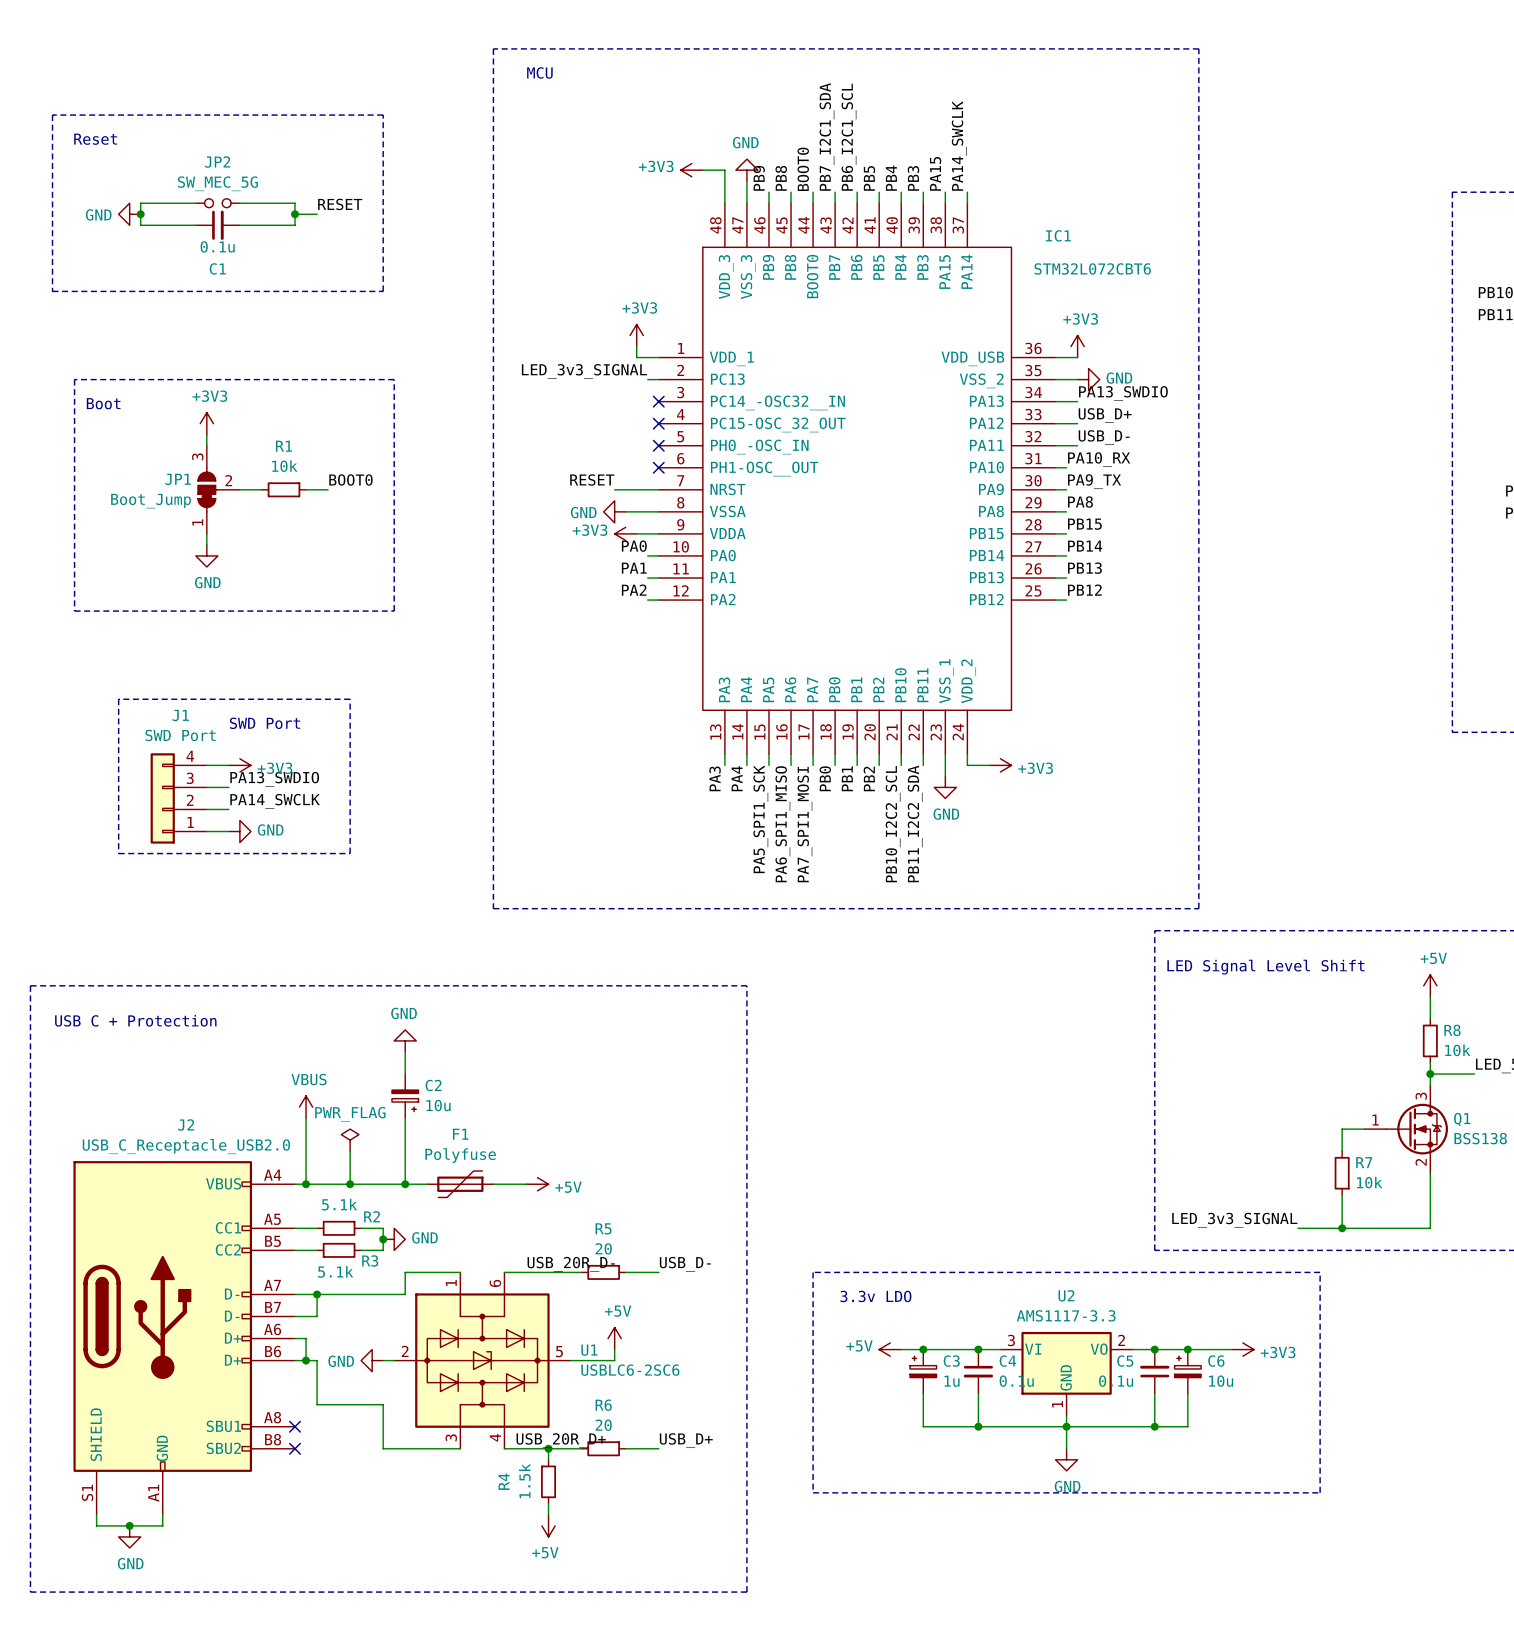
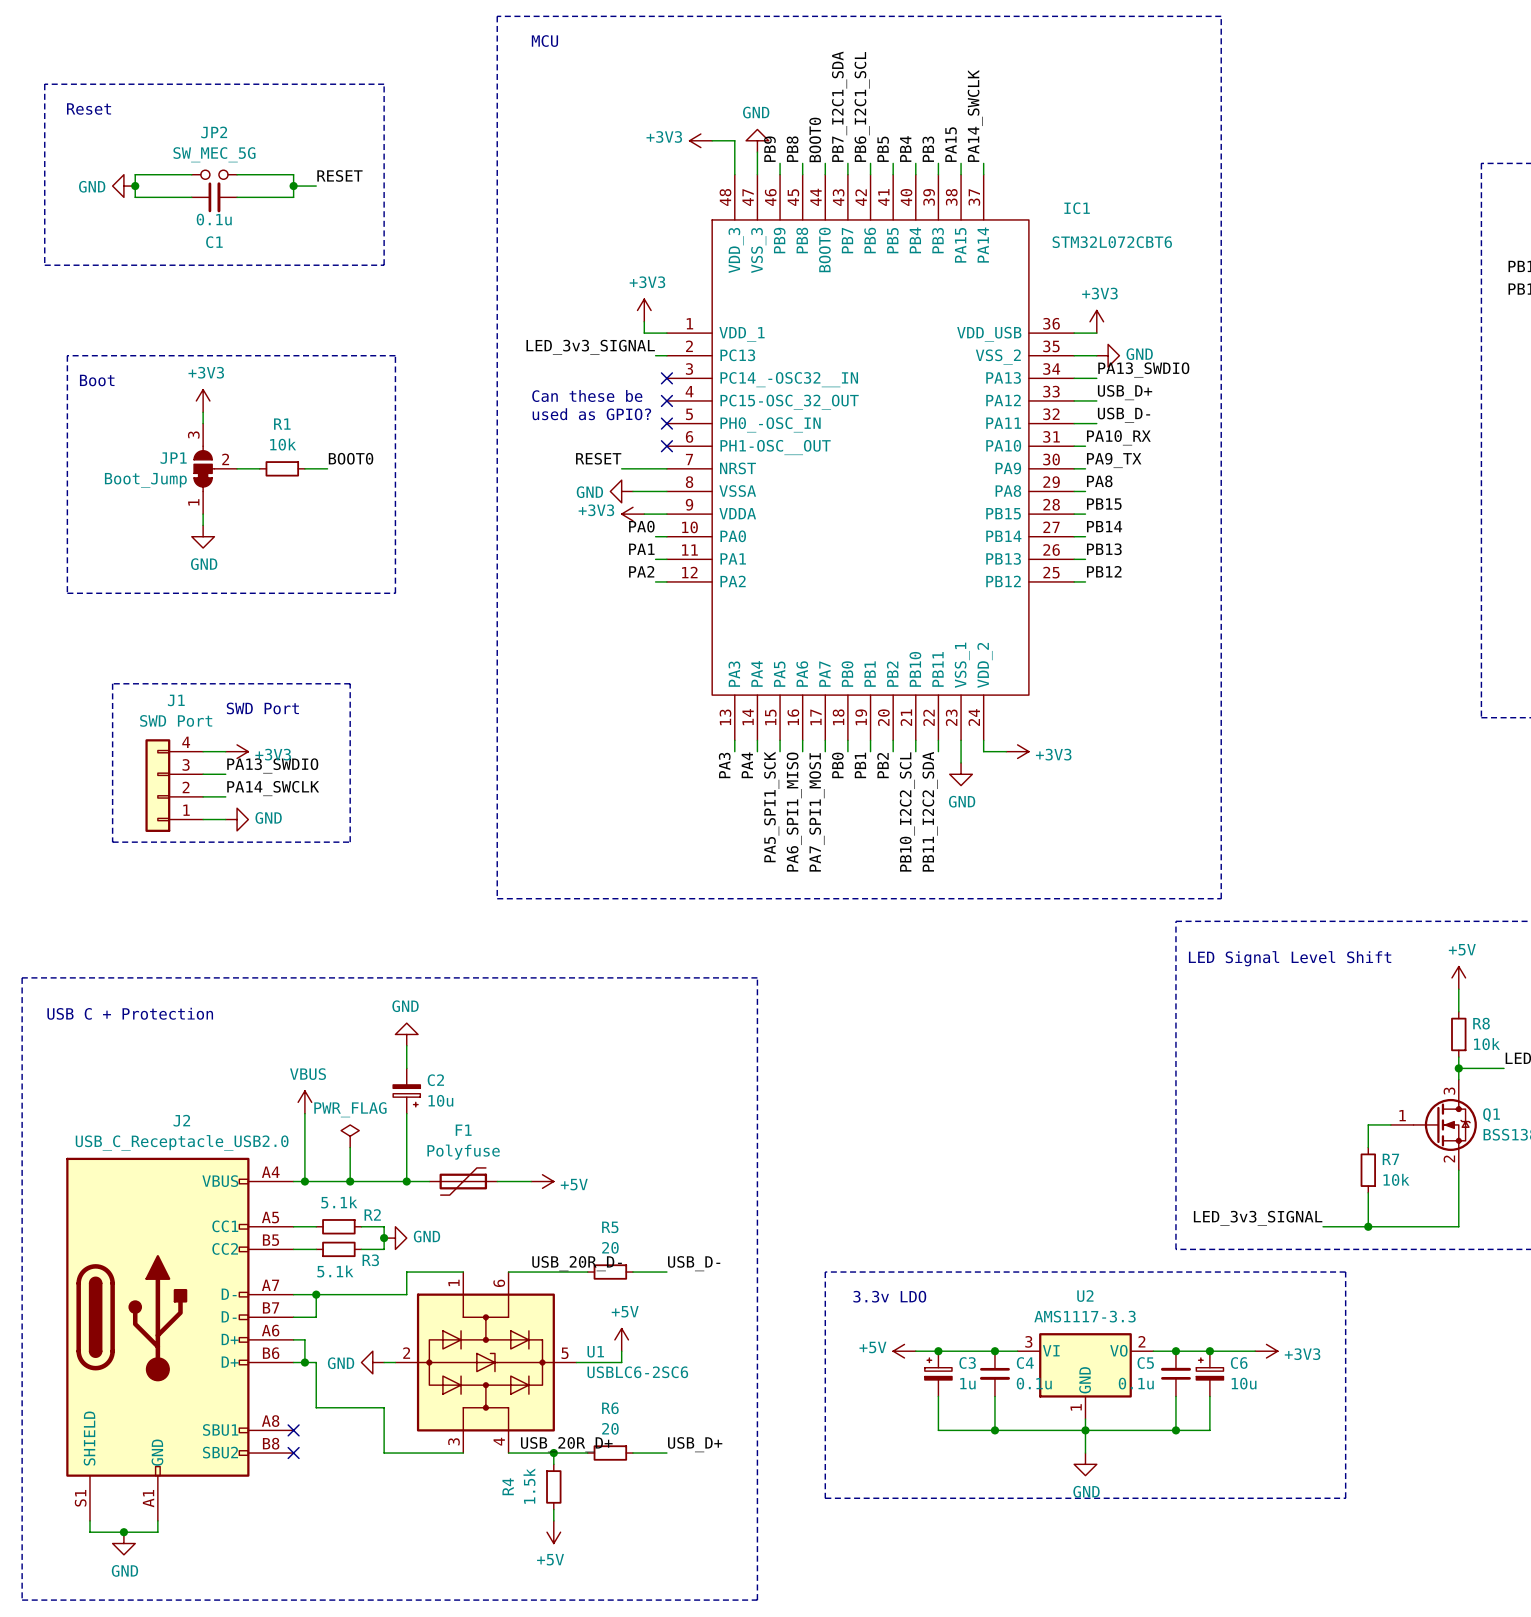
text: none -> Can these be (587, 395)
text: none -> used as GPIO? (591, 414)

